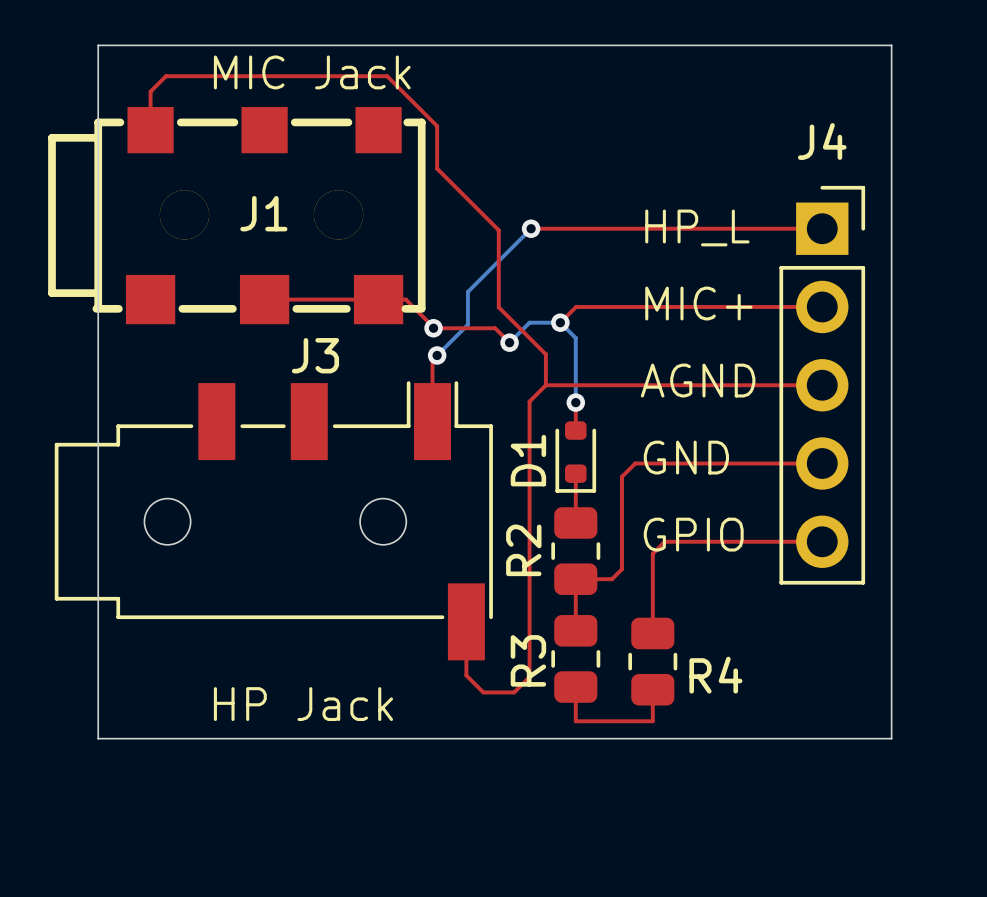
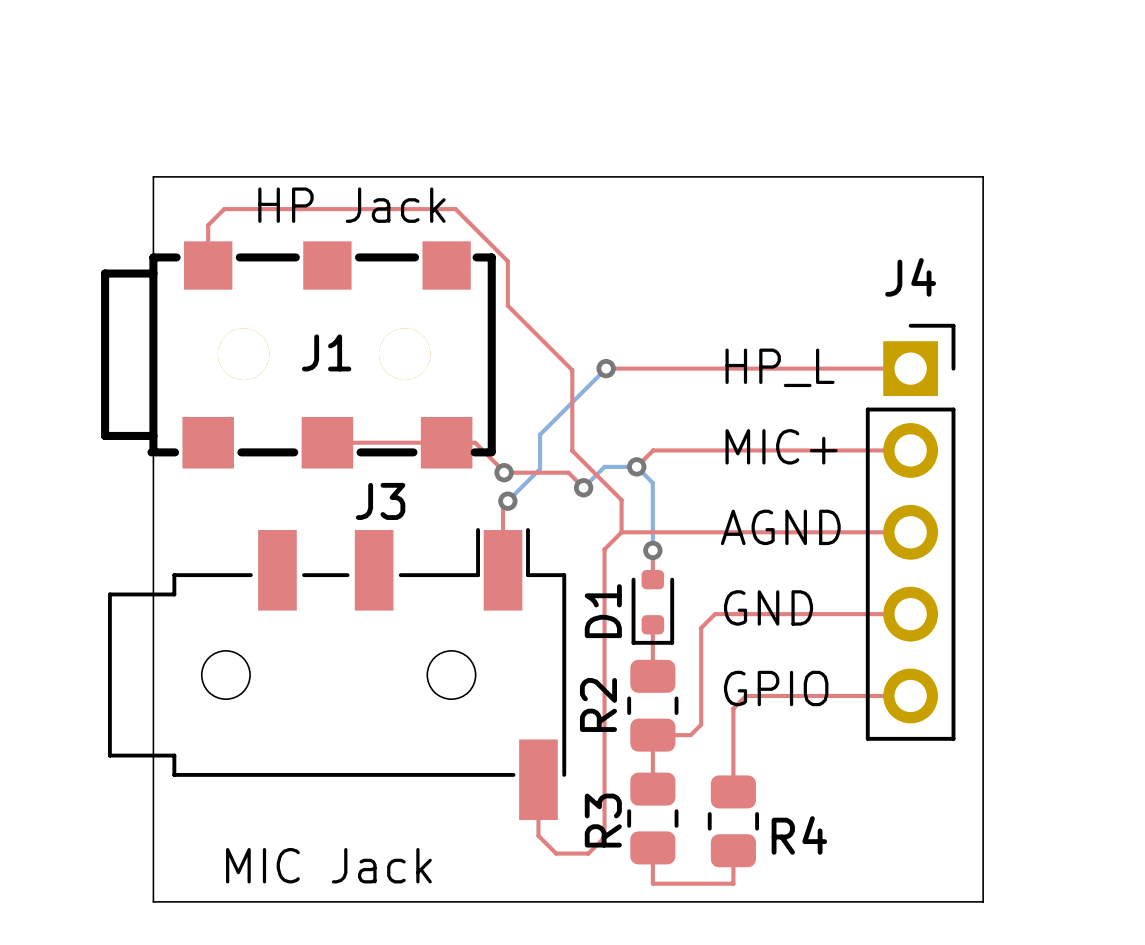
text: MIC Jack (312, 72) -> HP Jack (351, 205)
text: HP Jack (303, 704) -> MIC Jack (328, 865)

